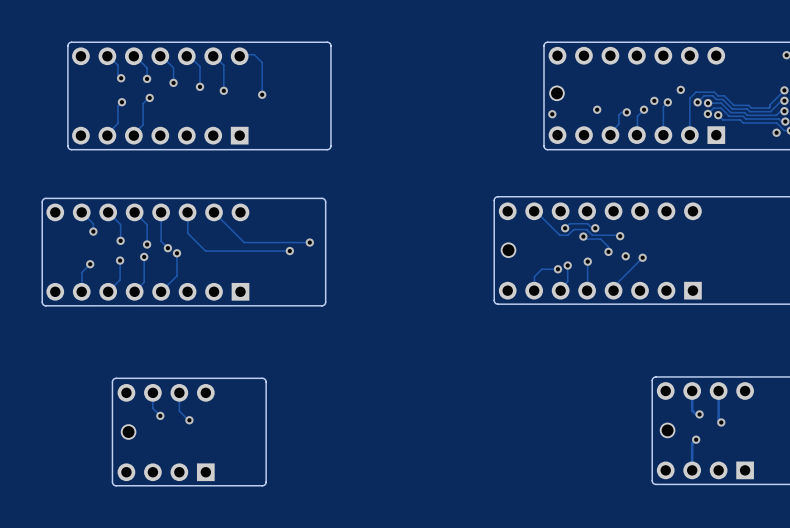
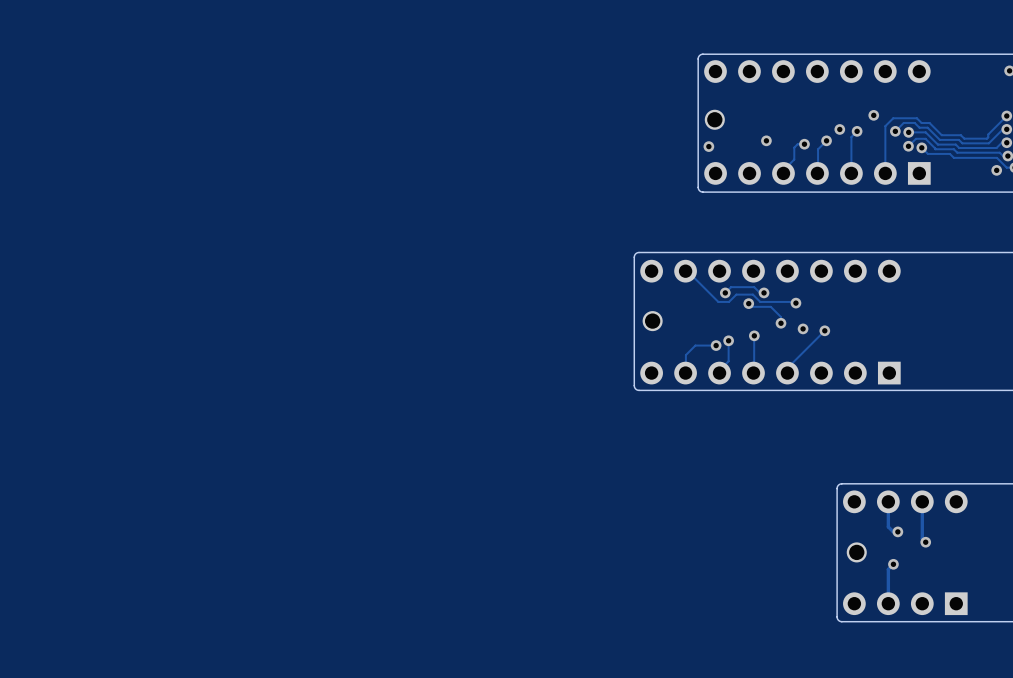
board edge: (327, 42) (70, 42) (67, 45) (68, 147) (71, 149) (328, 149) (330, 145) (330, 45) (327, 42) -> none
track: (107, 54) (117, 65) (117, 75) (121, 78) -> none
track: (133, 54) (147, 67) (147, 78) -> none
track: (160, 54) (173, 67) (173, 82) -> none
track: (188, 54) (200, 66) (200, 86) -> none
track: (213, 54) (223, 65) (223, 90) -> none
track: (239, 54) (254, 54) (262, 62) (262, 94) -> none
part: (160, 56) -> none
via: (121, 78) -> none
via: (147, 78) -> none
via: (173, 82) -> none
via: (200, 86) -> none
via: (223, 90) -> none
via: (262, 94) -> none
track: (149, 97) (143, 103) (143, 124) (133, 134) -> none
via: (149, 97) -> none
track: (121, 102) (117, 106) (117, 123) (107, 134) -> none
via: (121, 102) -> none
part: (160, 135) -> none
board edge: (321, 198) (44, 198) (42, 202) (42, 303) (45, 305) (323, 305) (325, 302) (325, 202) (321, 198) -> none
track: (81, 212) (93, 223) (93, 231) -> none
track: (108, 212) (120, 224) (120, 240) -> none
track: (135, 212) (147, 224) (147, 244) -> none
part: (147, 212) -> none
track: (161, 212) (161, 241) (167, 248) -> none
track: (187, 212) (187, 233) (205, 251) (289, 251) -> none
track: (214, 212) (244, 242) (309, 242) -> none
via: (93, 231) -> none
via: (120, 240) -> none
via: (309, 242) -> none
via: (147, 244) -> none
via: (167, 248) -> none
via: (289, 251) -> none
track: (176, 253) (176, 275) (161, 291) -> none
via: (176, 253) -> none
track: (144, 256) (144, 282) (134, 291) -> none
via: (144, 256) -> none
track: (120, 260) (120, 279) (108, 291) -> none
via: (120, 260) -> none
track: (90, 264) (81, 272) (81, 291) -> none
via: (90, 264) -> none
part: (147, 291) -> none
board edge: (262, 378) (113, 379) (113, 484) (264, 484) (266, 382) (262, 378) -> none
track: (152, 392) (152, 408) (160, 415) -> none
part: (166, 392) -> none
track: (179, 392) (179, 411) (189, 420) -> none
via: (160, 415) -> none
via: (189, 420) -> none
part: (128, 432) -> none
part: (166, 472) -> none

